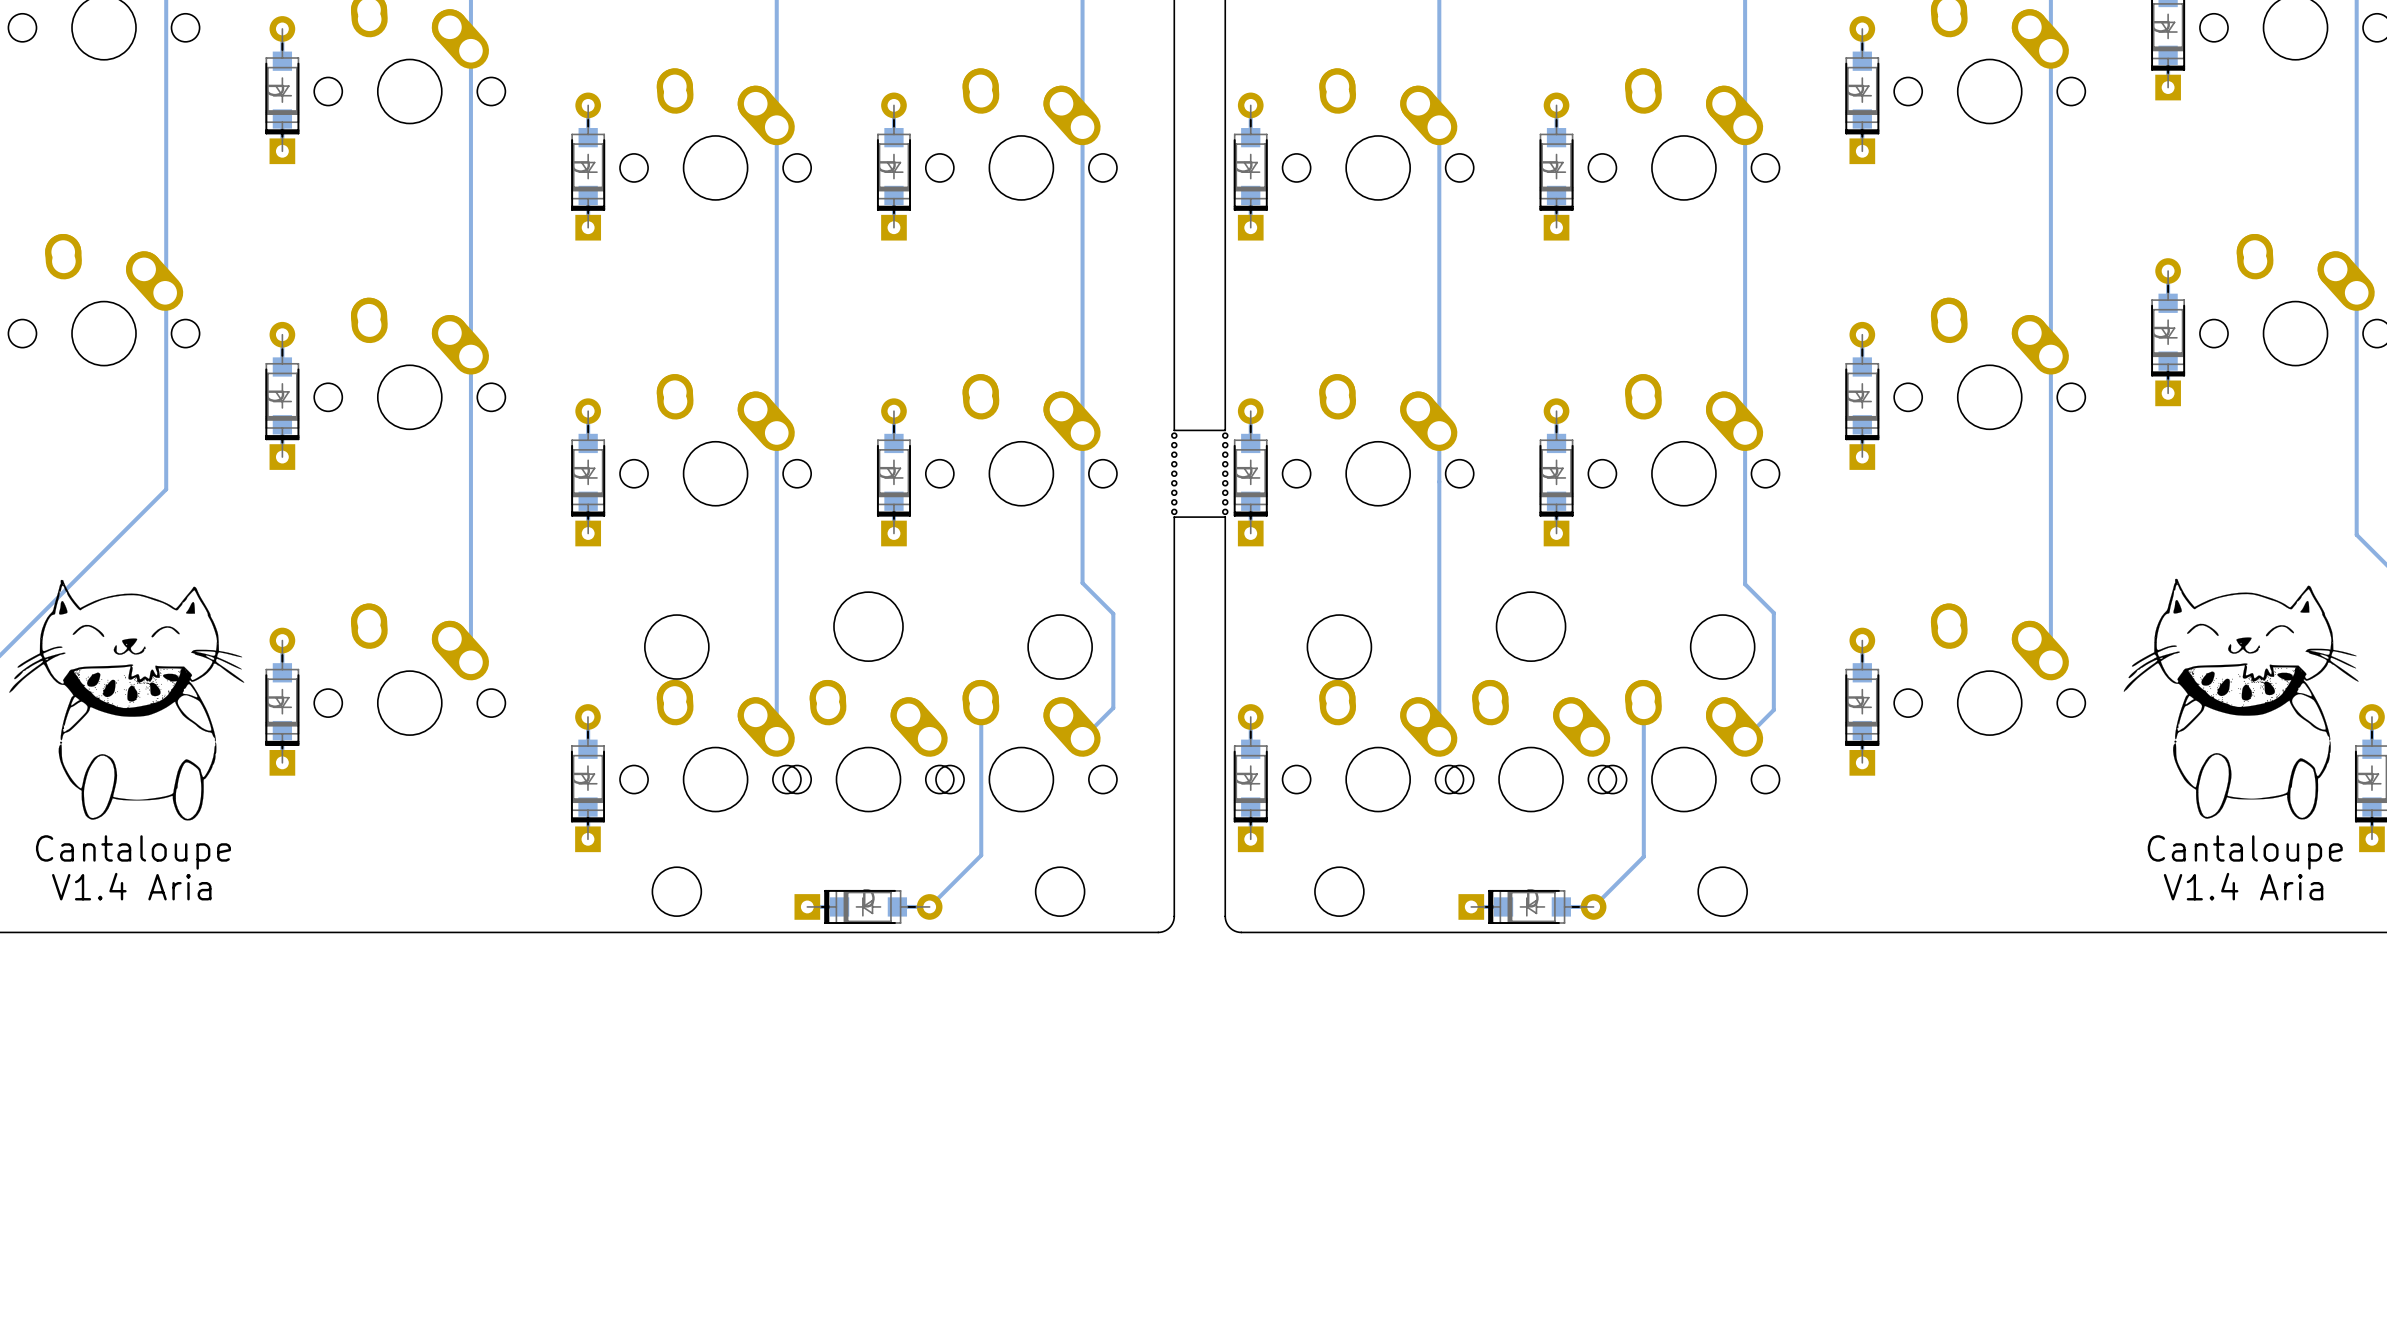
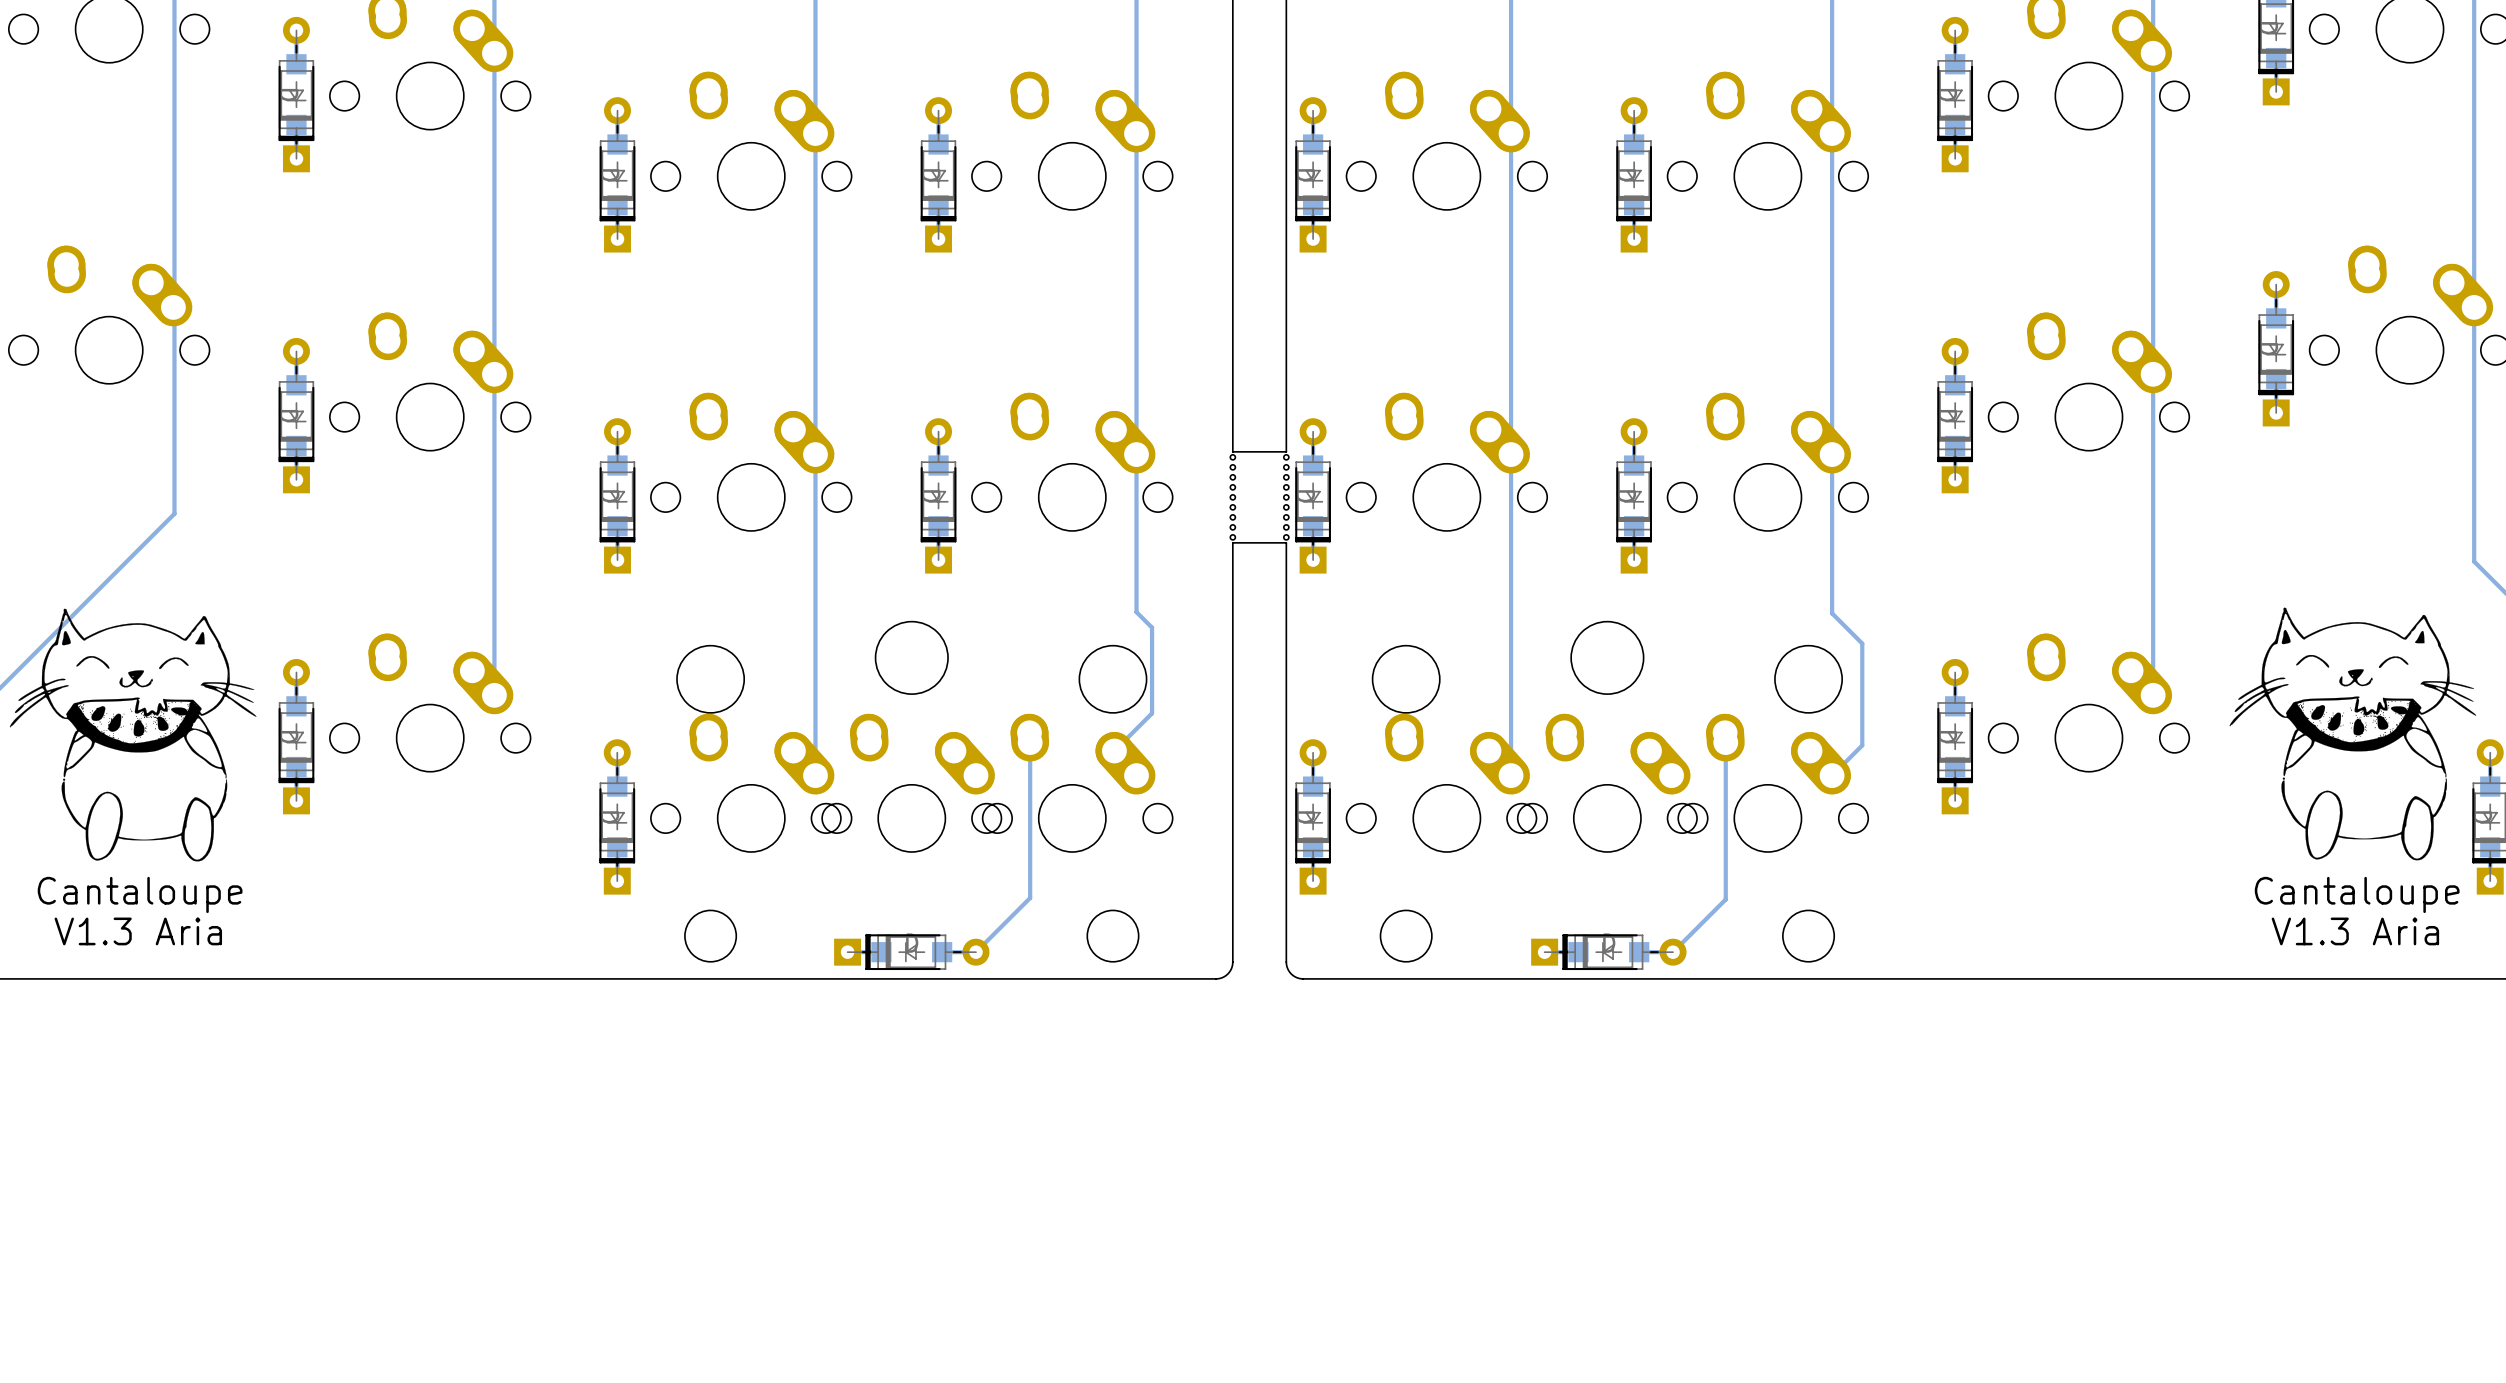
track: (1097, 597) (1113, 613) (1113, 707) (1082, 738) -> (1152, 627) (1152, 713) (1114, 750)
text: V1.4 Aria (131, 886) -> V1.3 Aria (138, 931)
text: V1.4 Aria (2243, 886) -> V1.3 Aria (2355, 931)

